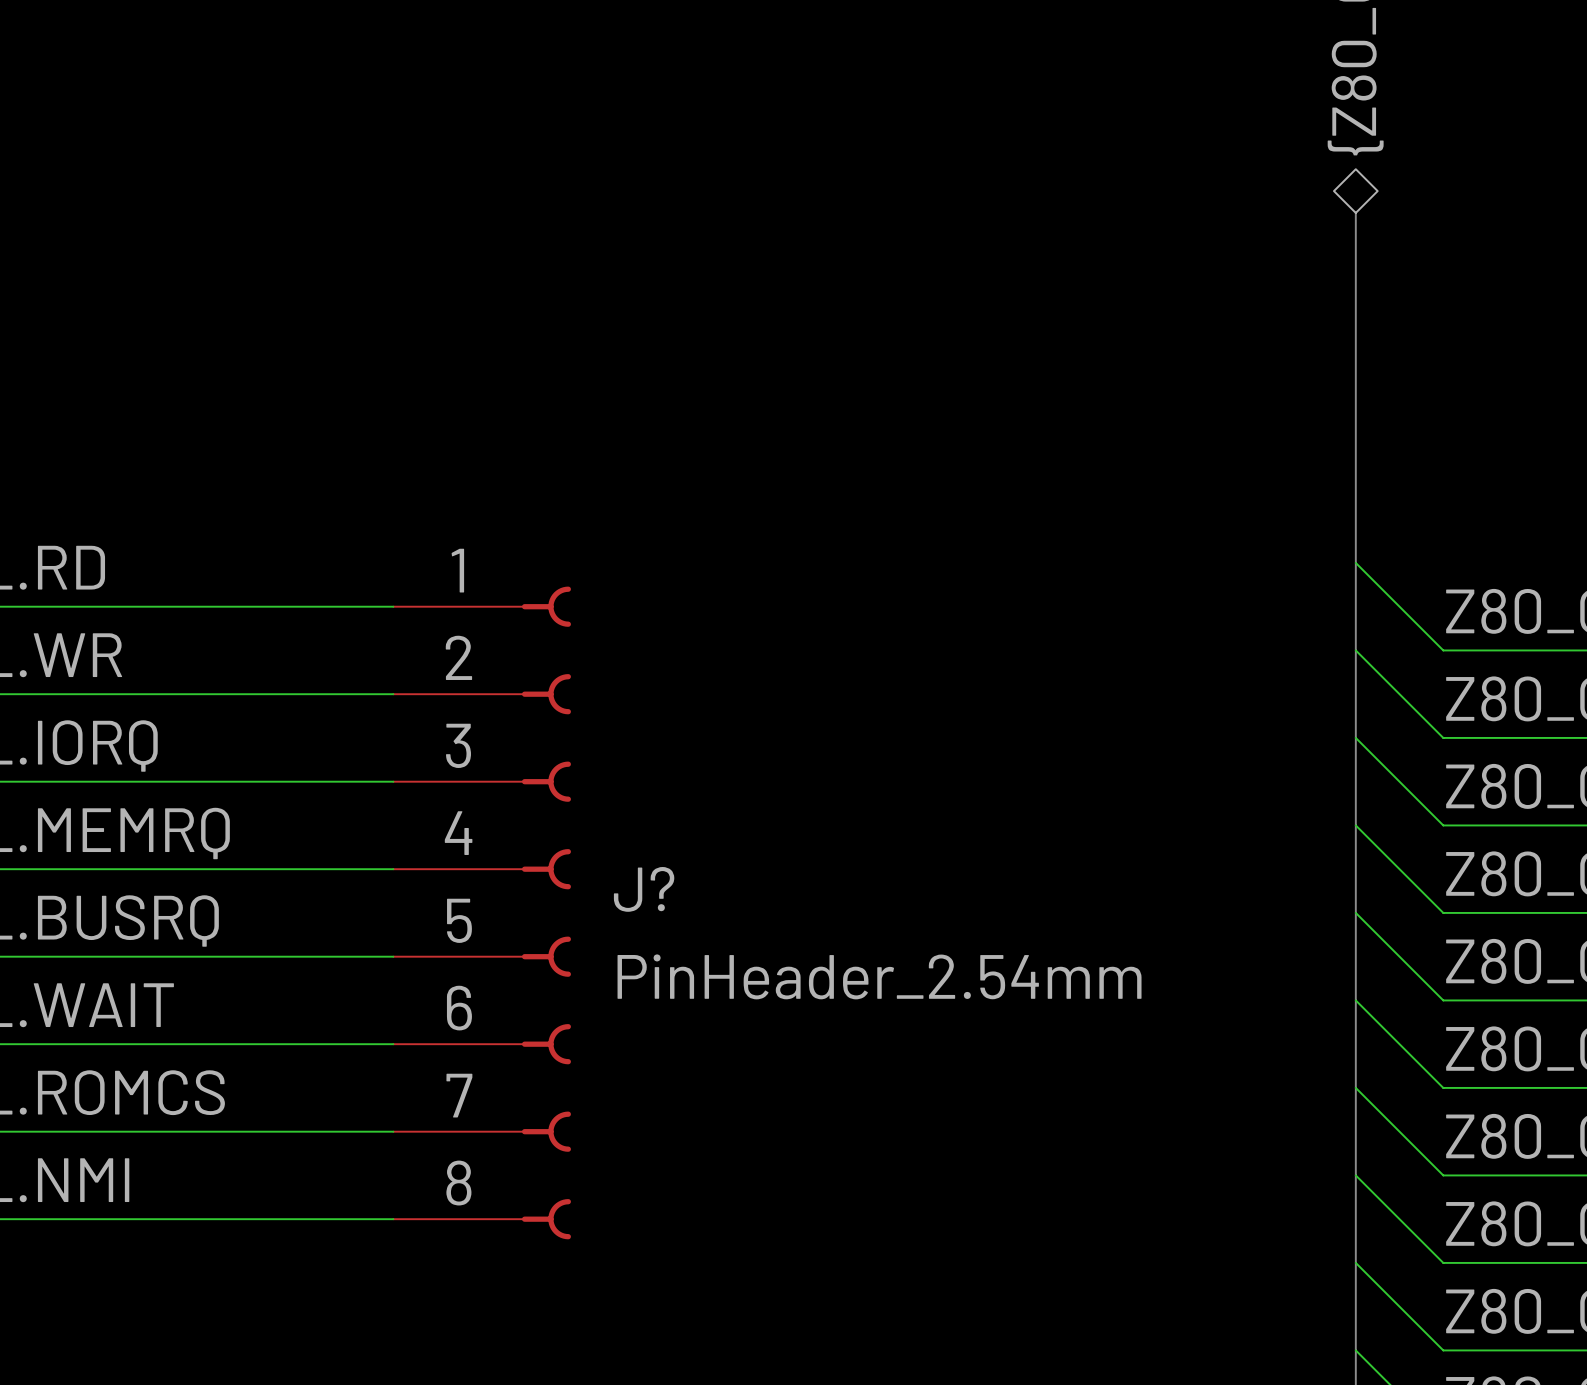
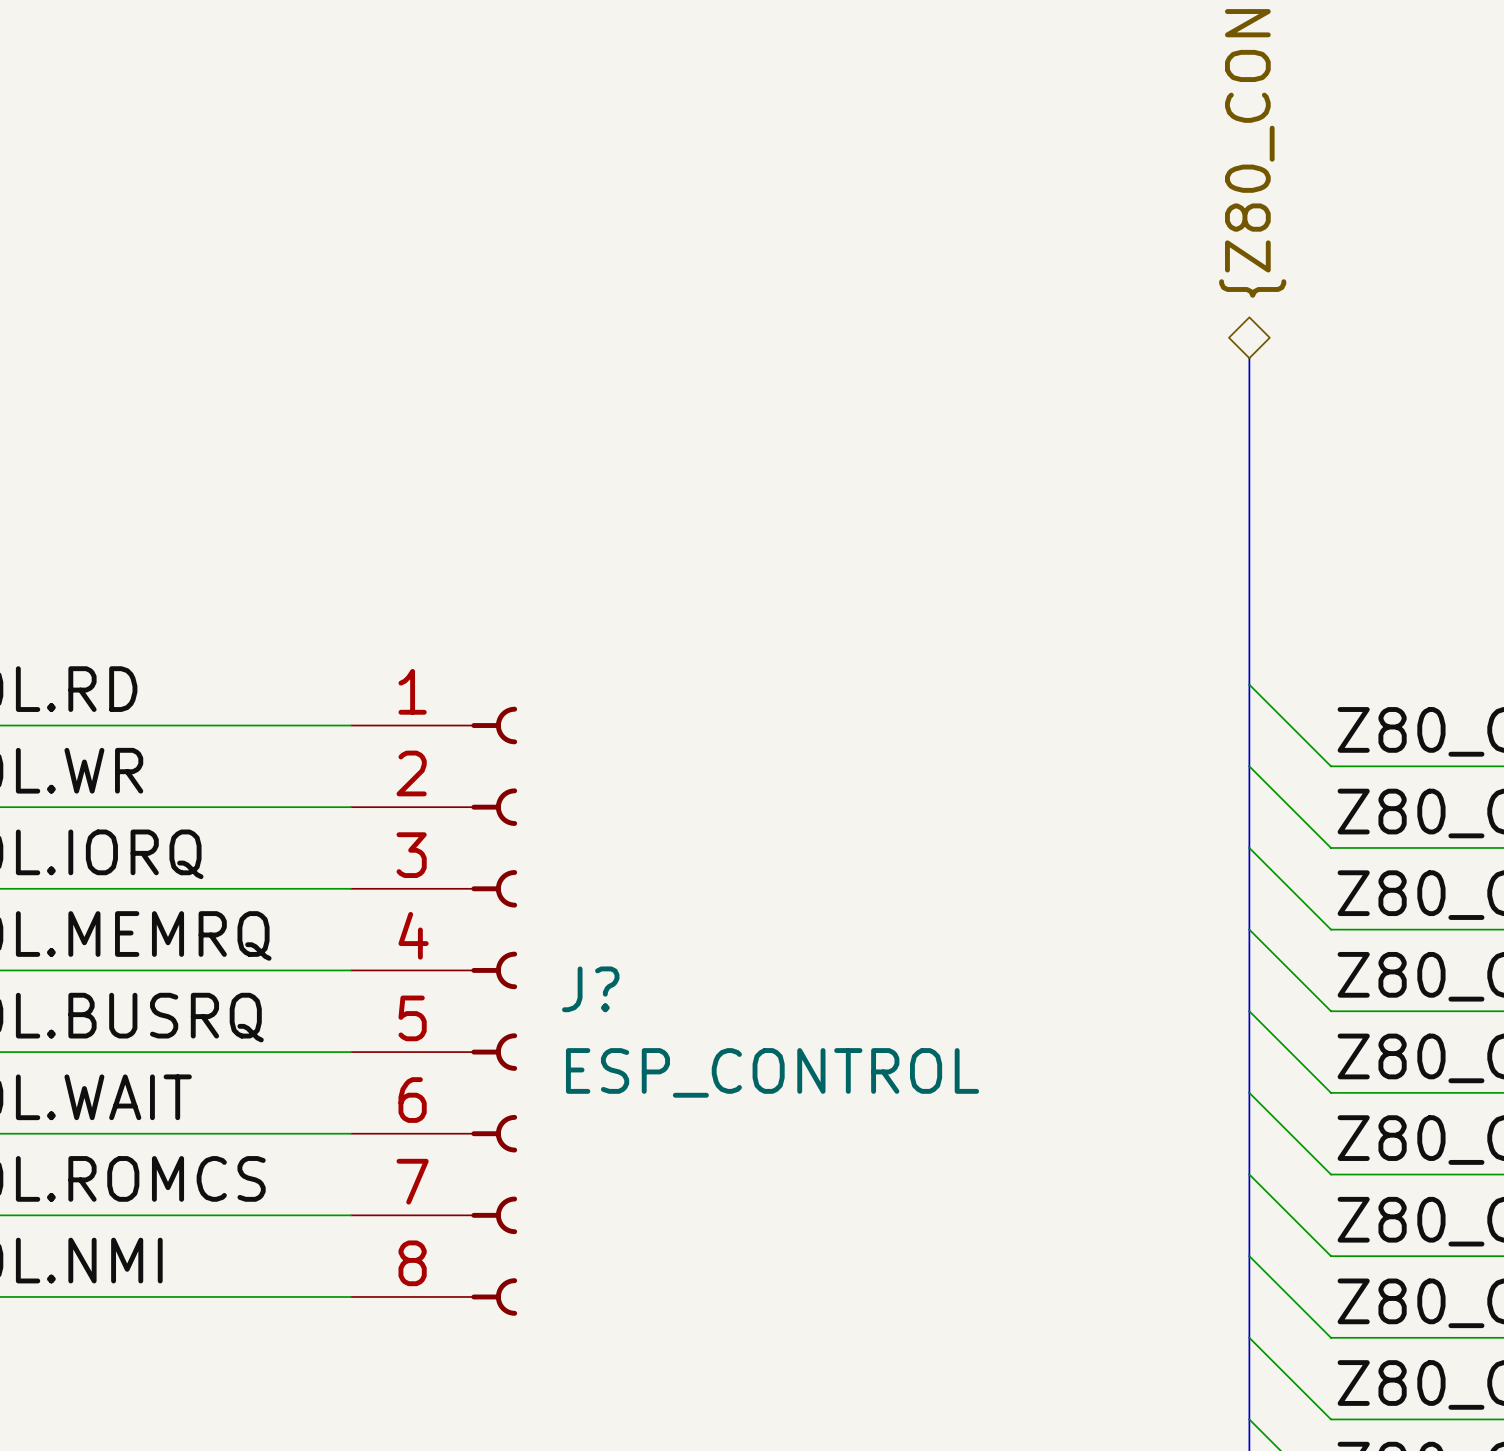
J? value: PinHeader_2.54mm (879, 976) -> ESP_CONTROL (772, 1072)

